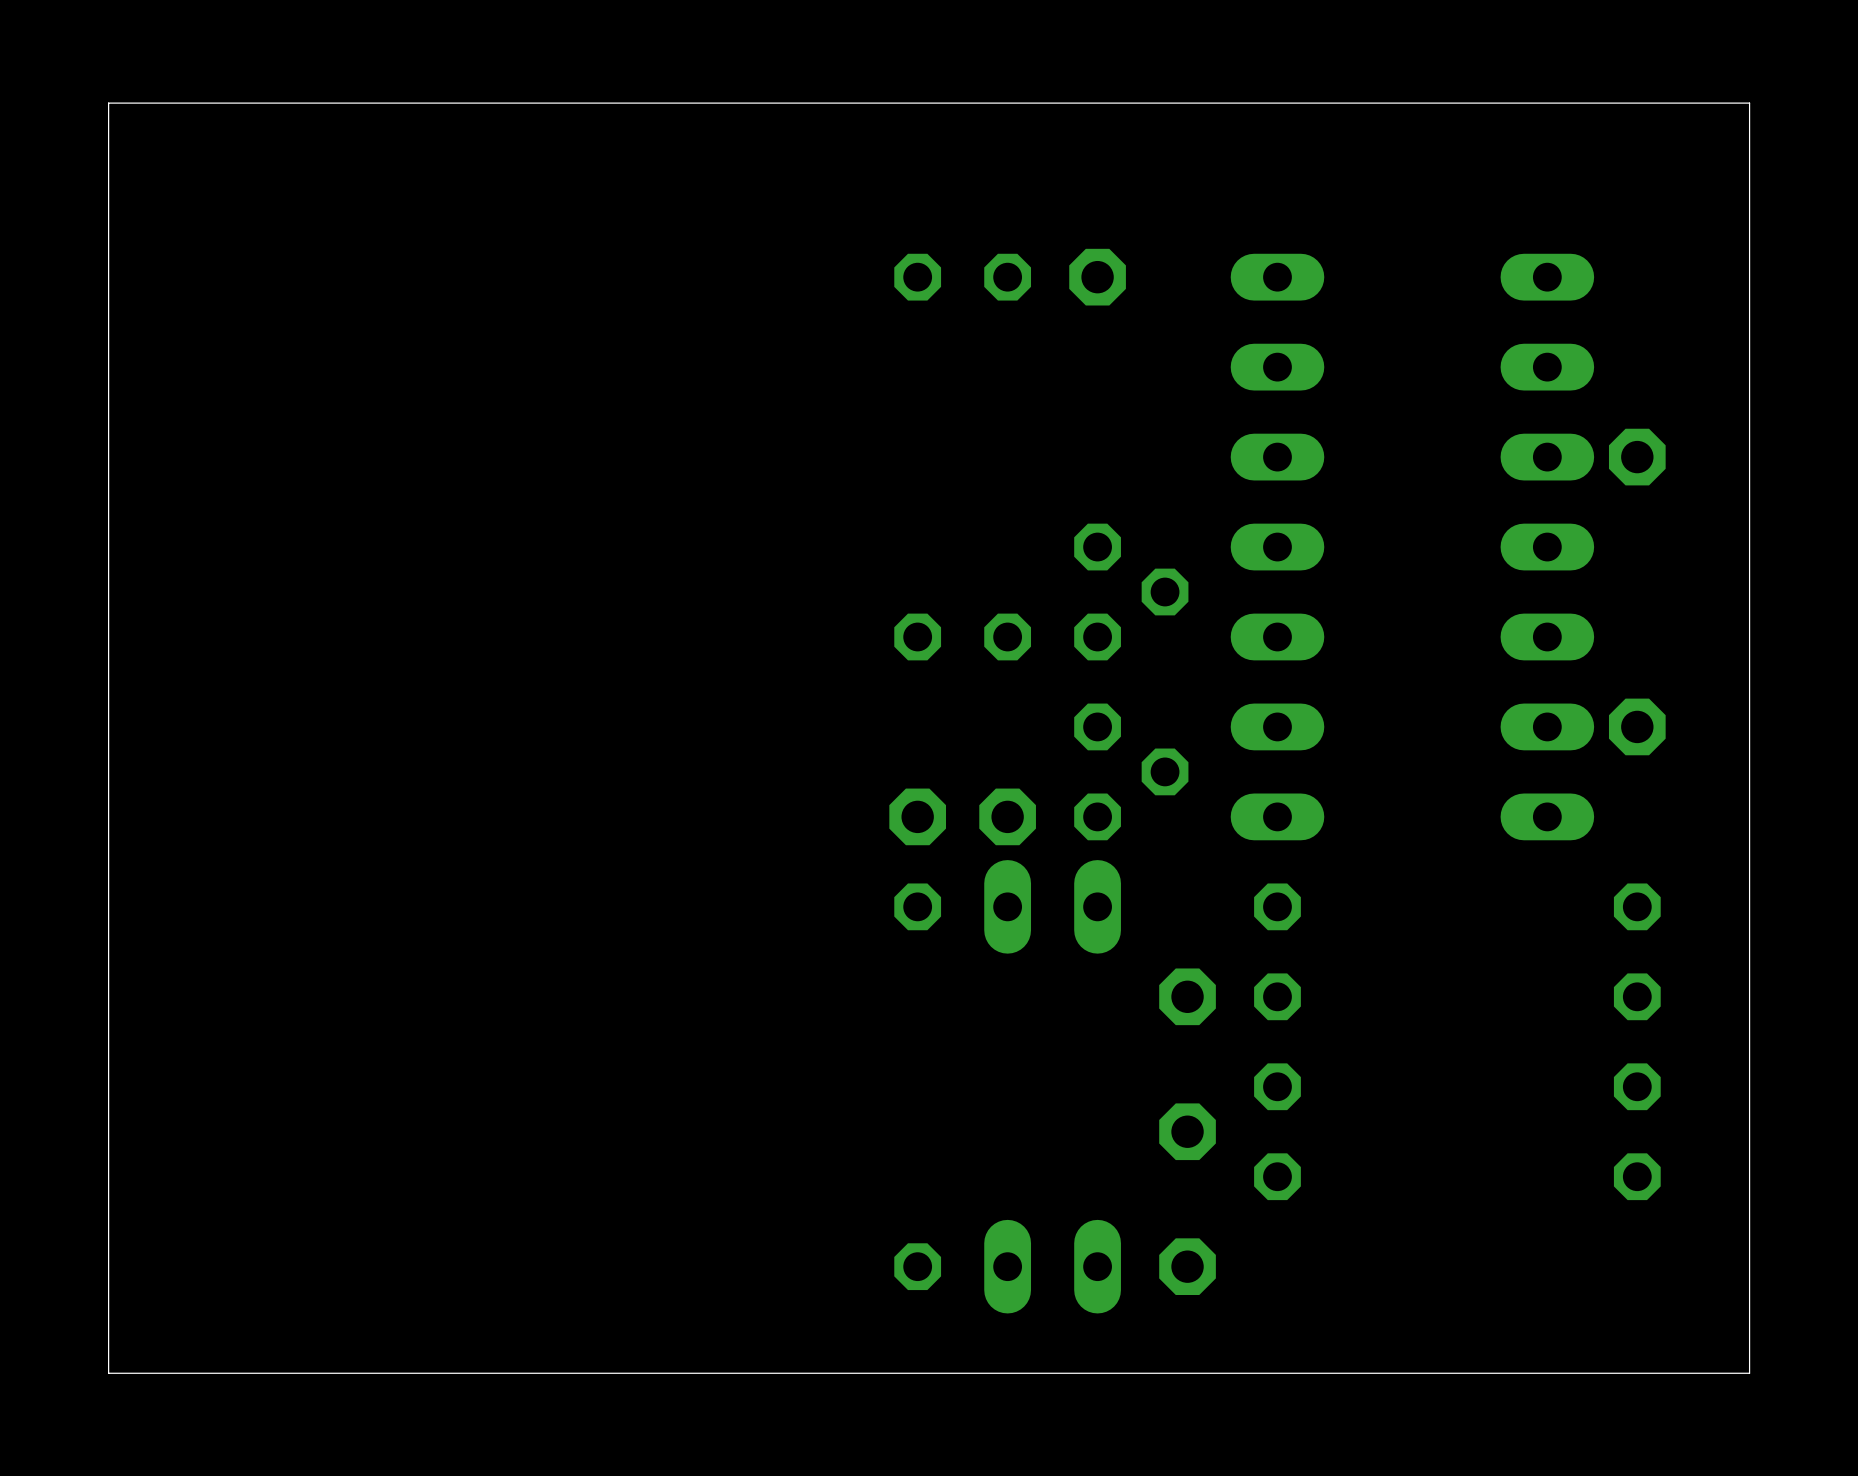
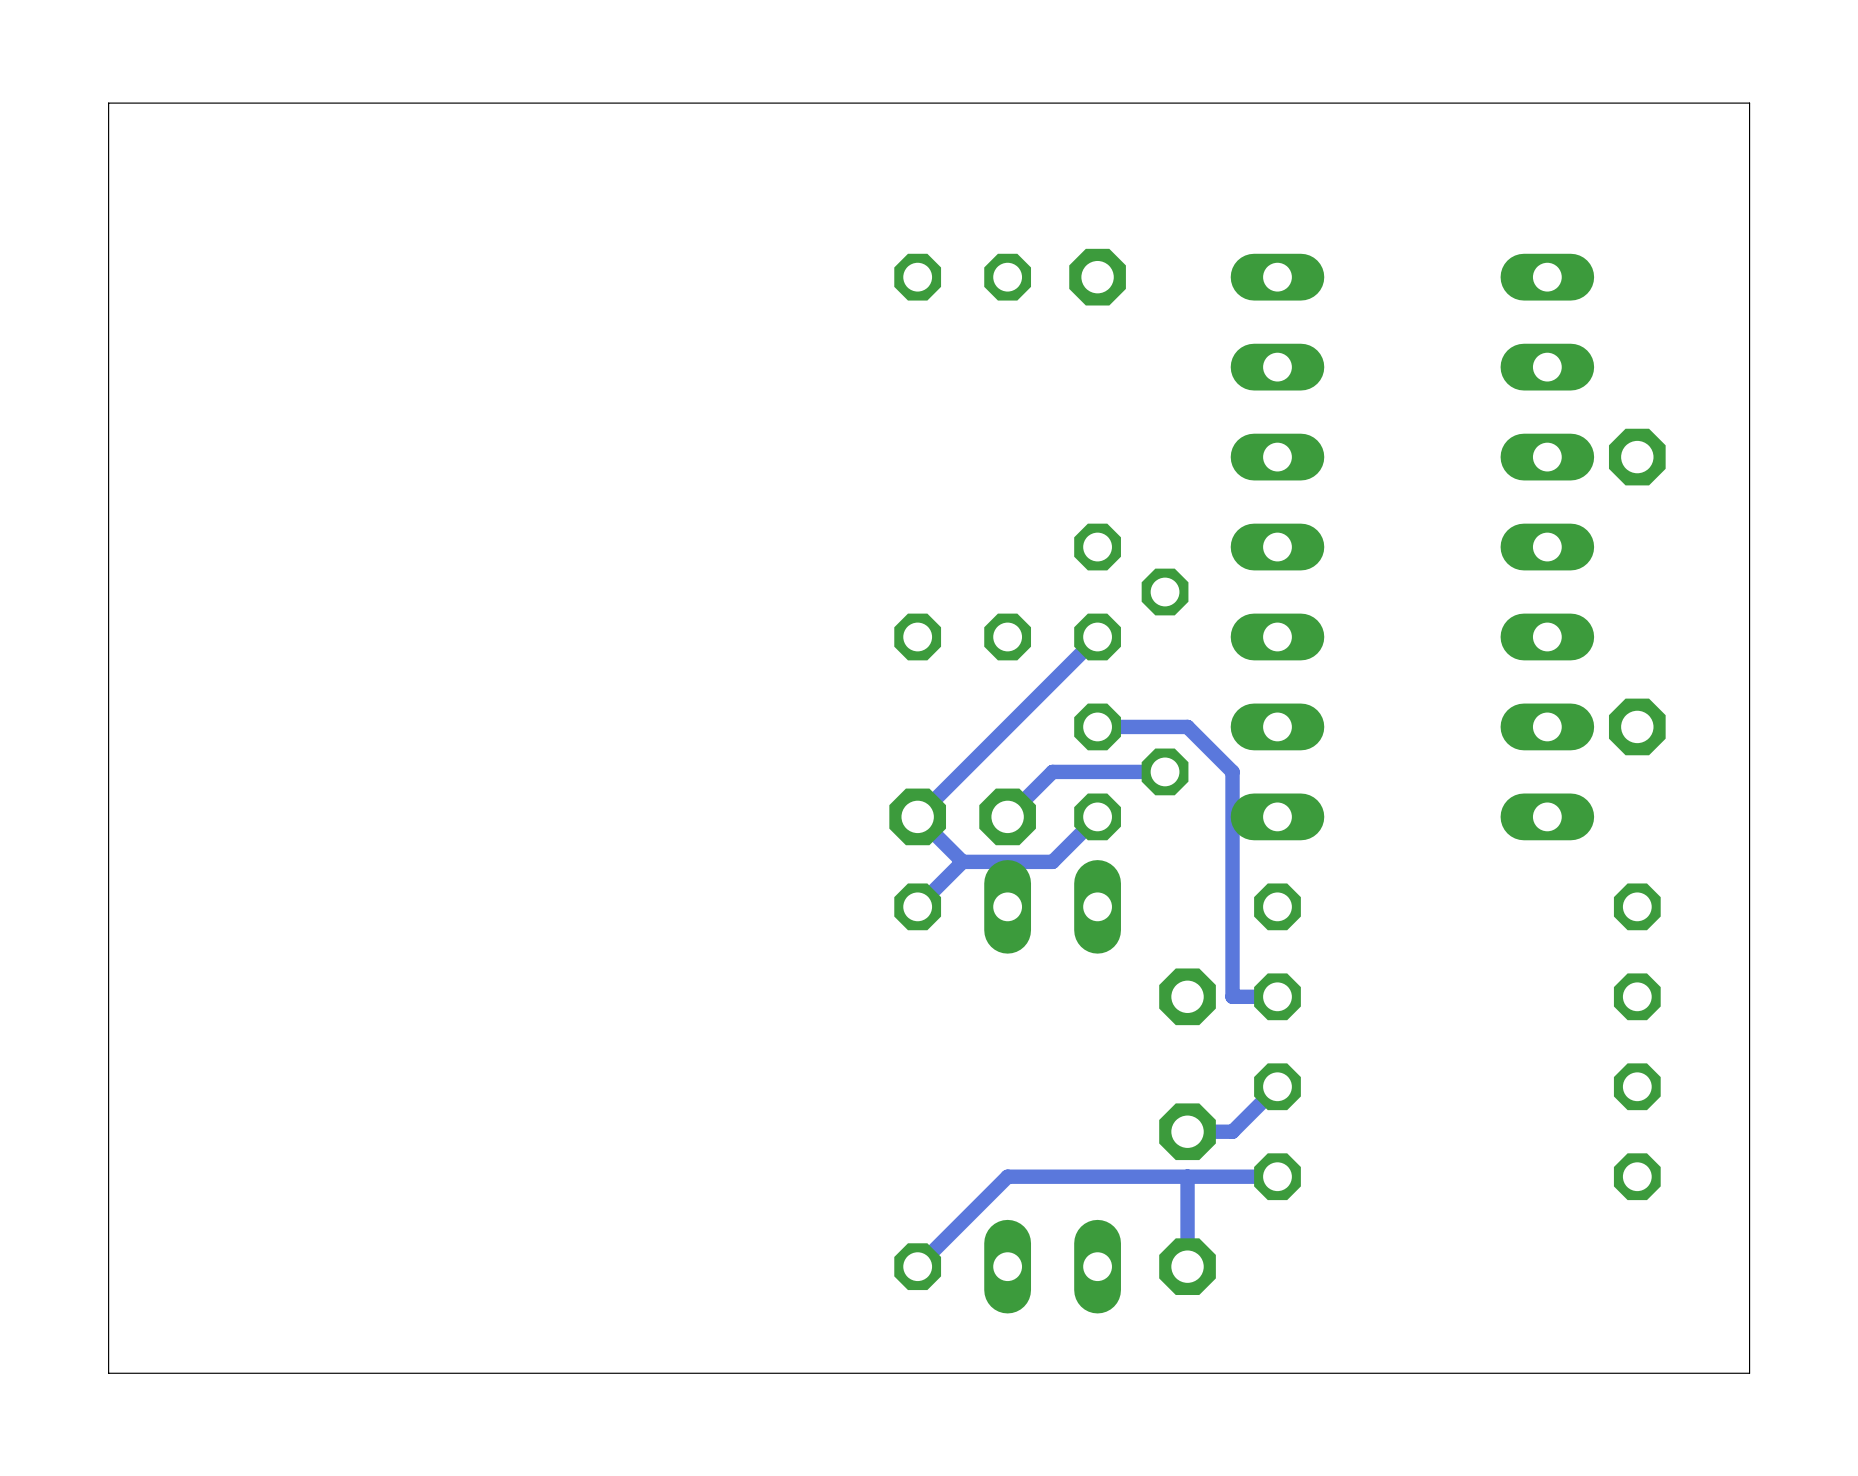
track: none -> (1097, 636) (917, 816) (962, 861)
track: none -> (1097, 726) (1187, 726) (1232, 771) (1232, 996) (1277, 996)
track: none -> (1165, 771) (1052, 771) (1007, 816)
track: none -> (1097, 816) (1052, 861) (962, 861)
track: none -> (962, 861) (917, 906)
track: none -> (1277, 1086) (1232, 1131) (1187, 1131)
track: none -> (1187, 1176) (1187, 1266)
track: none -> (1277, 1176) (1007, 1176) (917, 1266)

